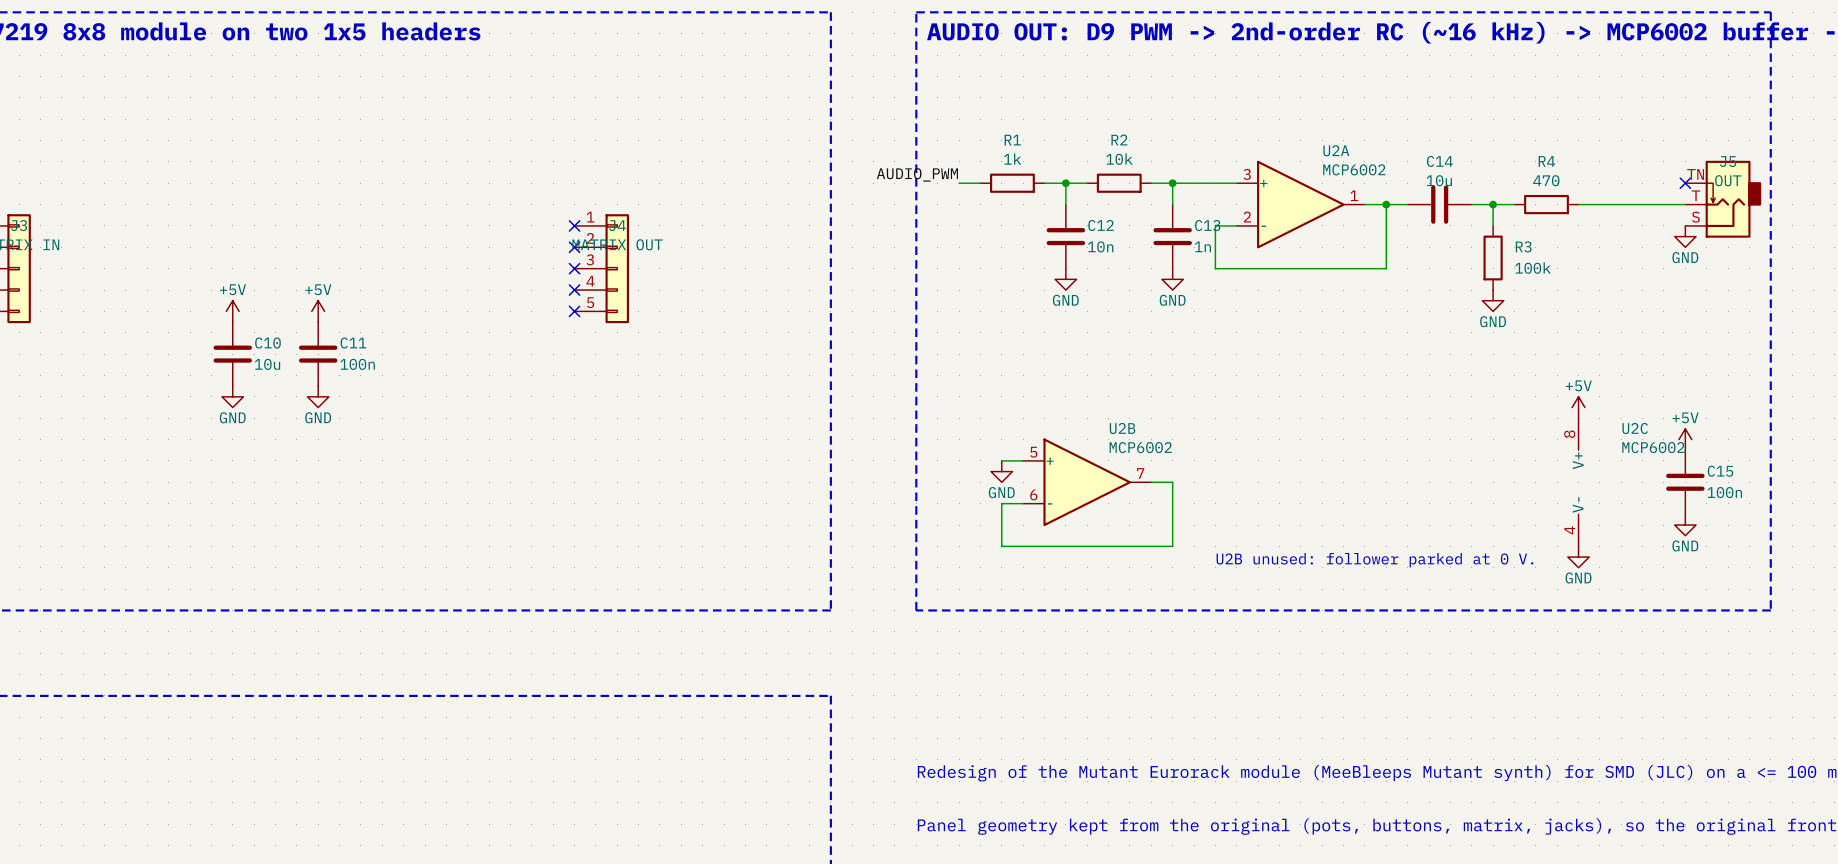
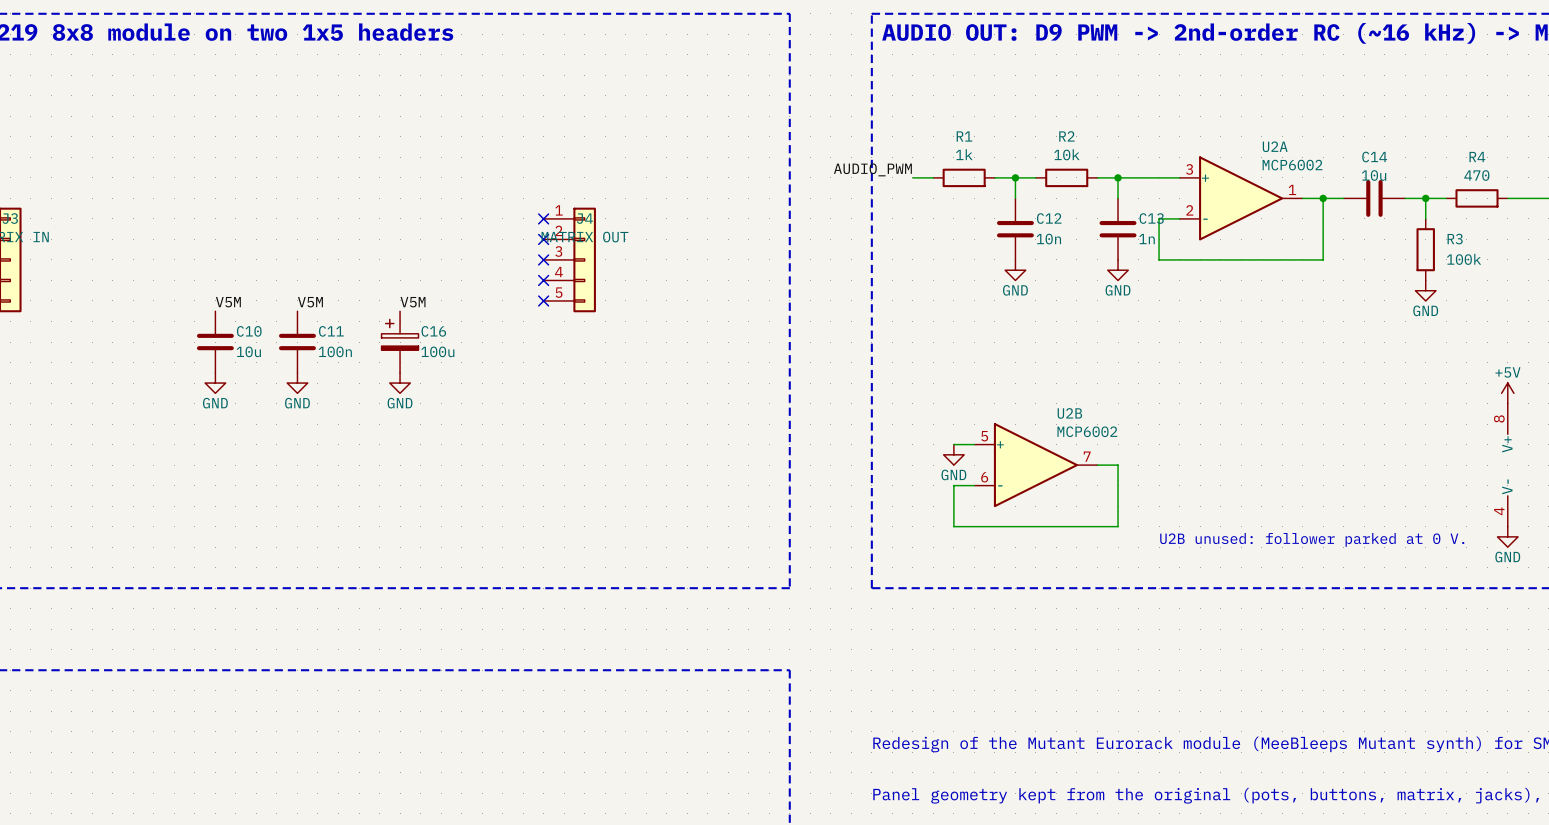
power symbol: +5V (232, 311) -> none
power symbol: +5V (318, 311) -> none
label: none -> V5M (228, 302)
label: none -> V5M (310, 302)
label: none -> V5M (413, 302)
C16: none -> 100u (400, 342)
power symbol: none -> GND (400, 383)

